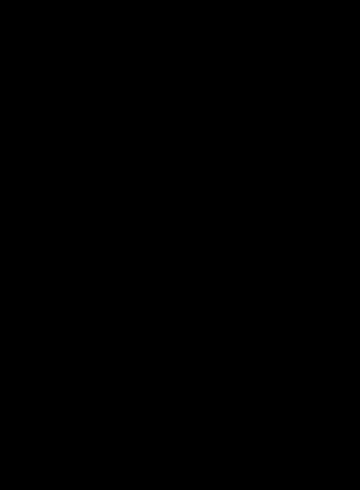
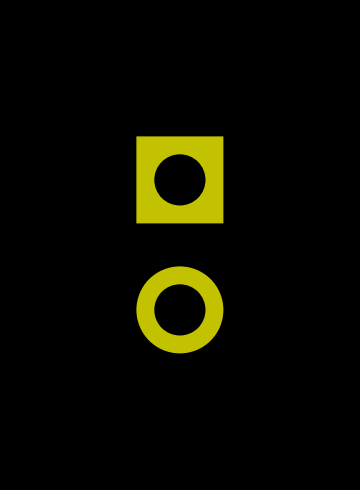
part: none -> (179, 244)

